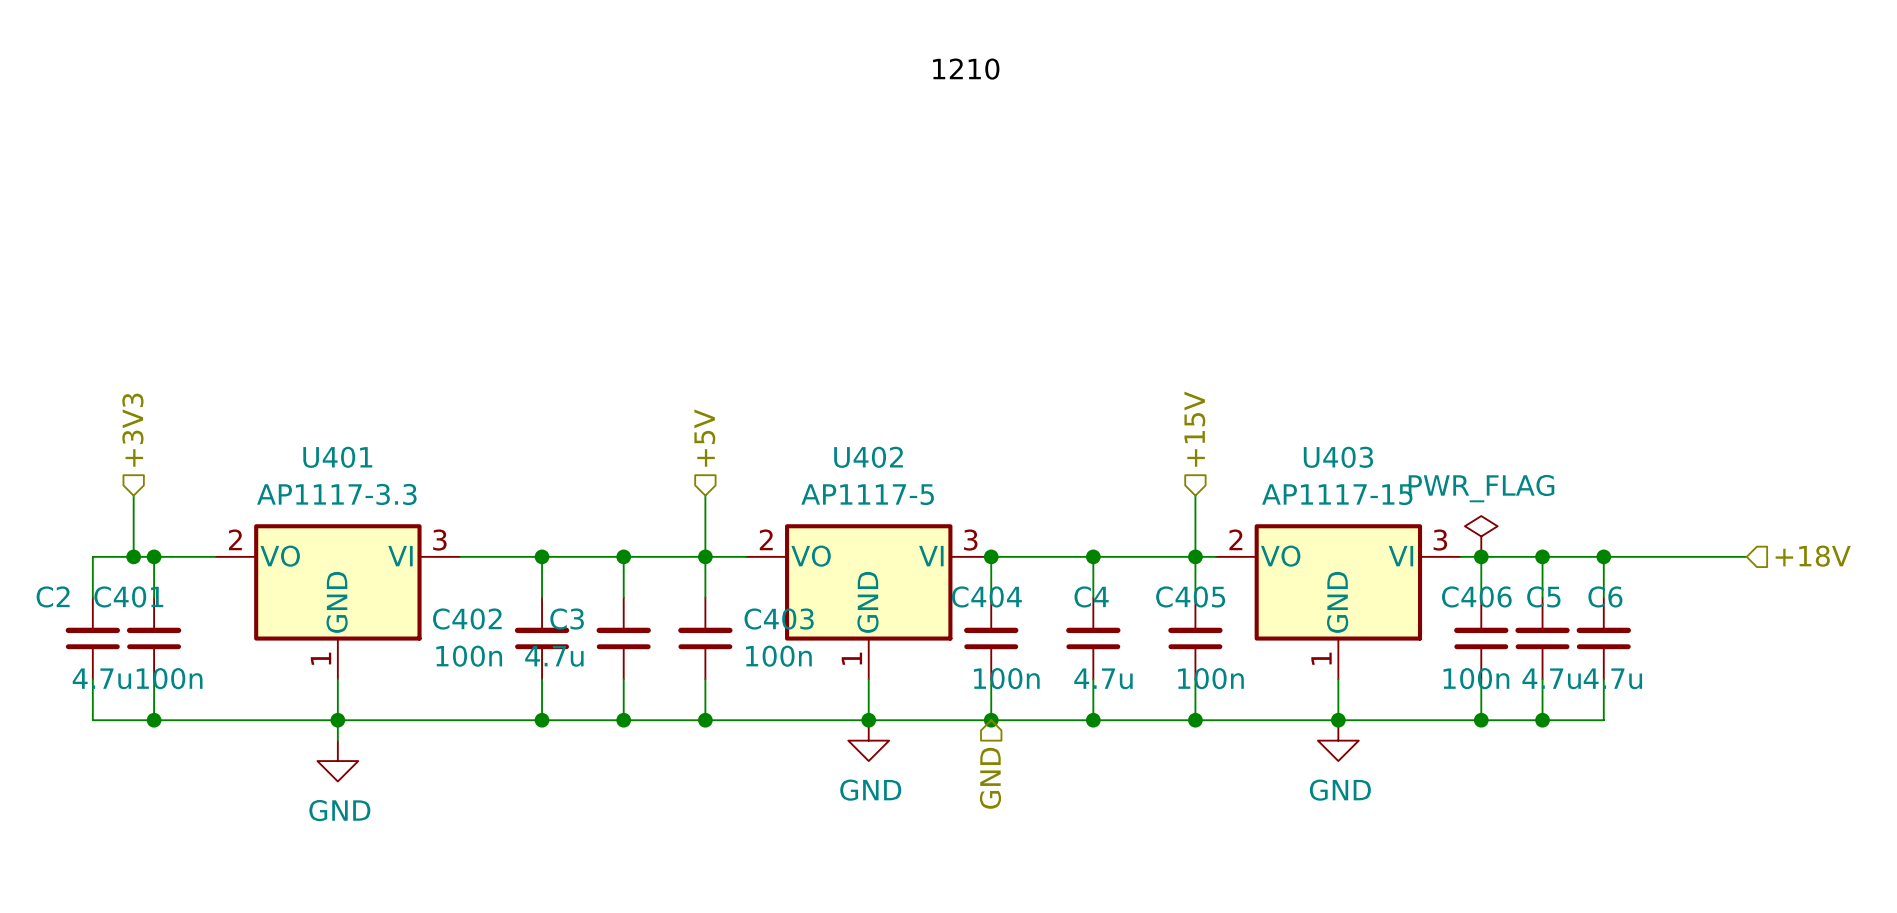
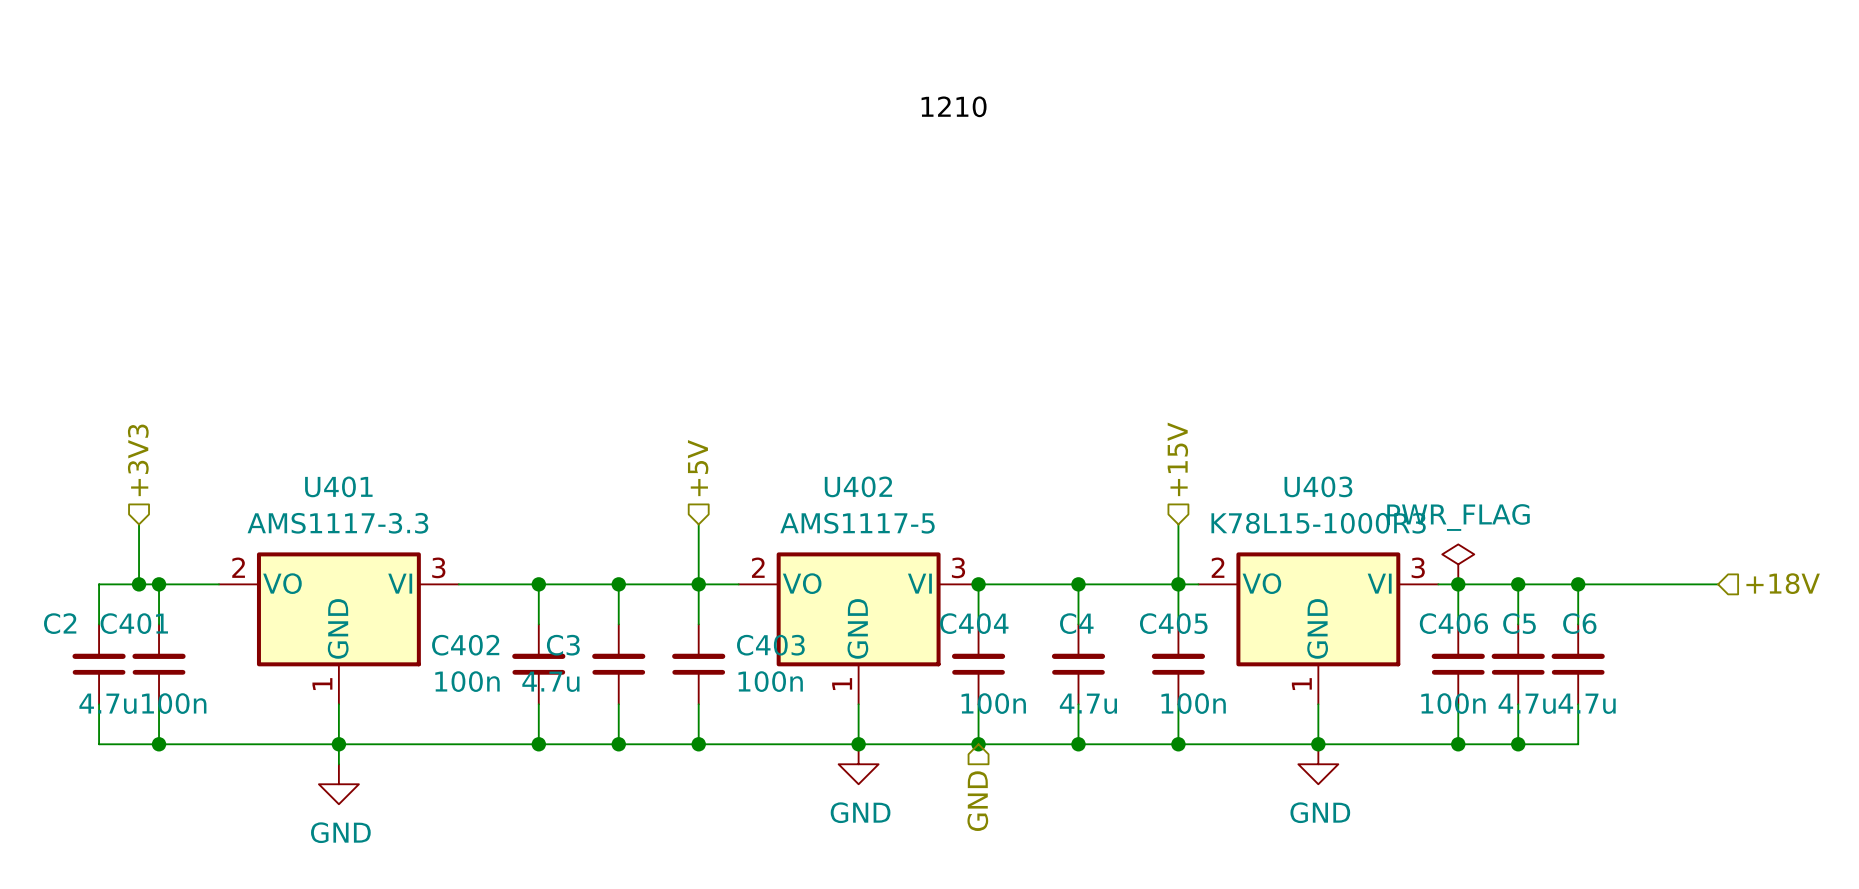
U401 value: AP1117-3.3 (336, 494) -> AMS1117-3.3 (337, 523)
U402 value: AP1117-5 (867, 494) -> AMS1117-5 (857, 523)
U403 value: AP1117-15 (1337, 494) -> K78L15-1000R3 (1318, 523)

